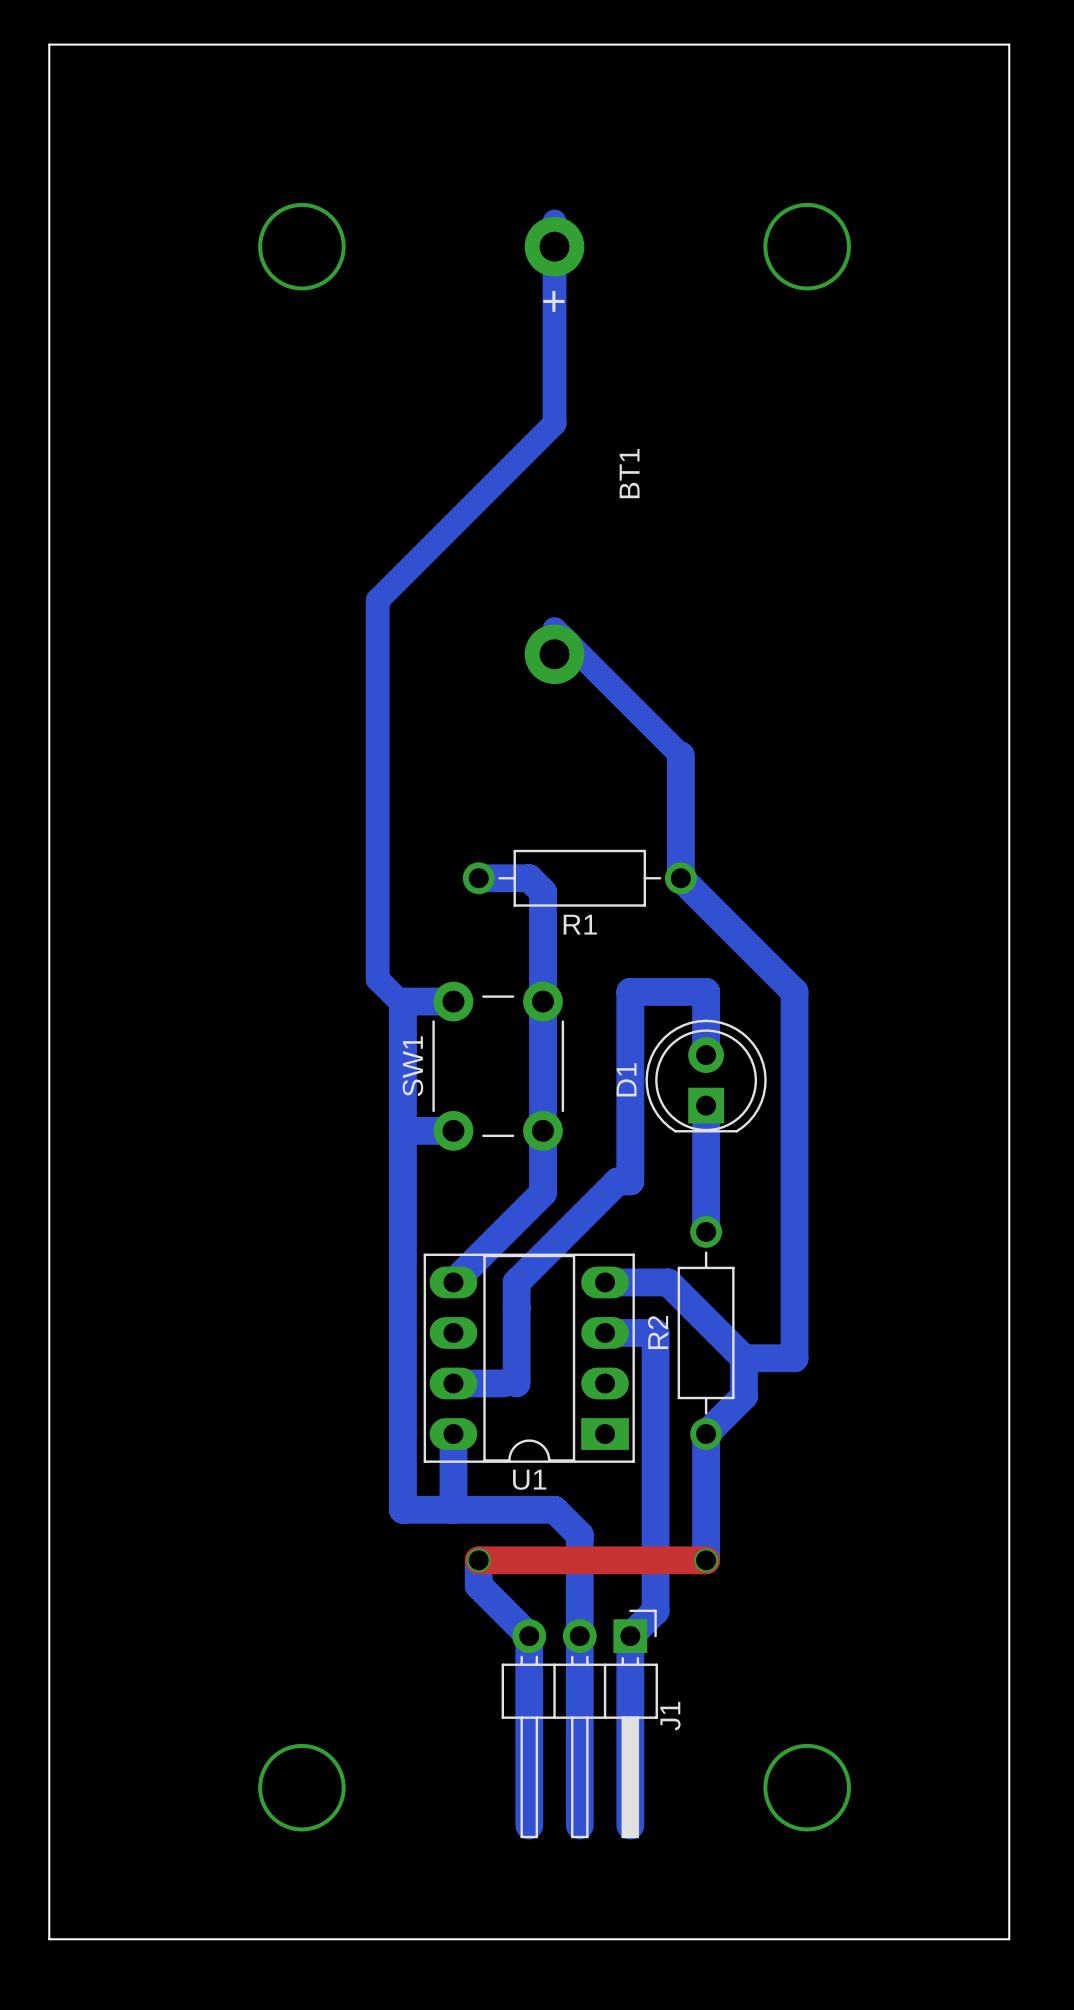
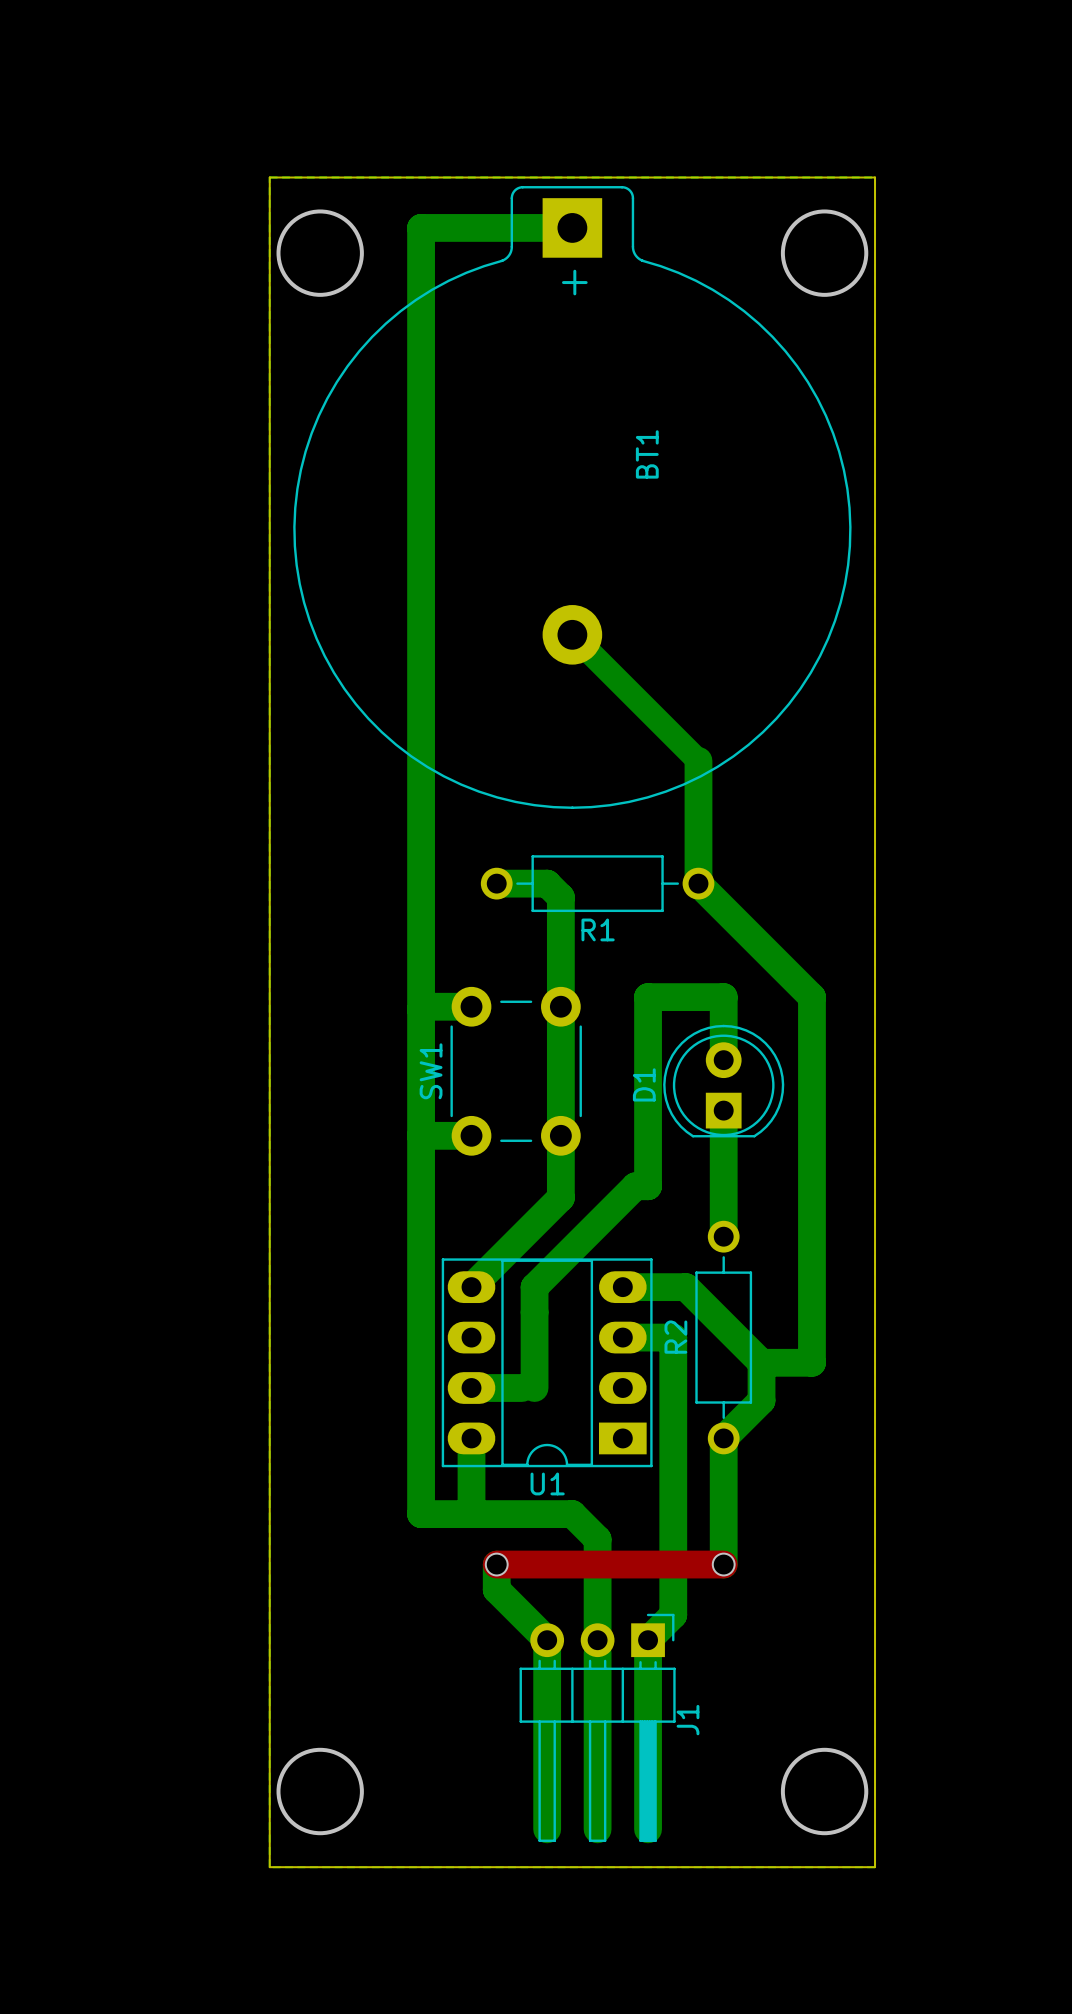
board edge: (49, 44) (49, 1939) (1009, 1939) (1009, 44) (49, 44) -> (269, 177) (269, 1867) (875, 1867) (875, 177) (269, 177)
BT1 footprint: [524, 216, 585, 685] -> [293, 186, 852, 809]
bottom track: (554, 221) (554, 423) (377, 600) (377, 979) (402, 1004) -> (572, 227) (421, 227) (421, 1009)
BT1 name position: BT1 (629, 473) -> BT1 (647, 454)

